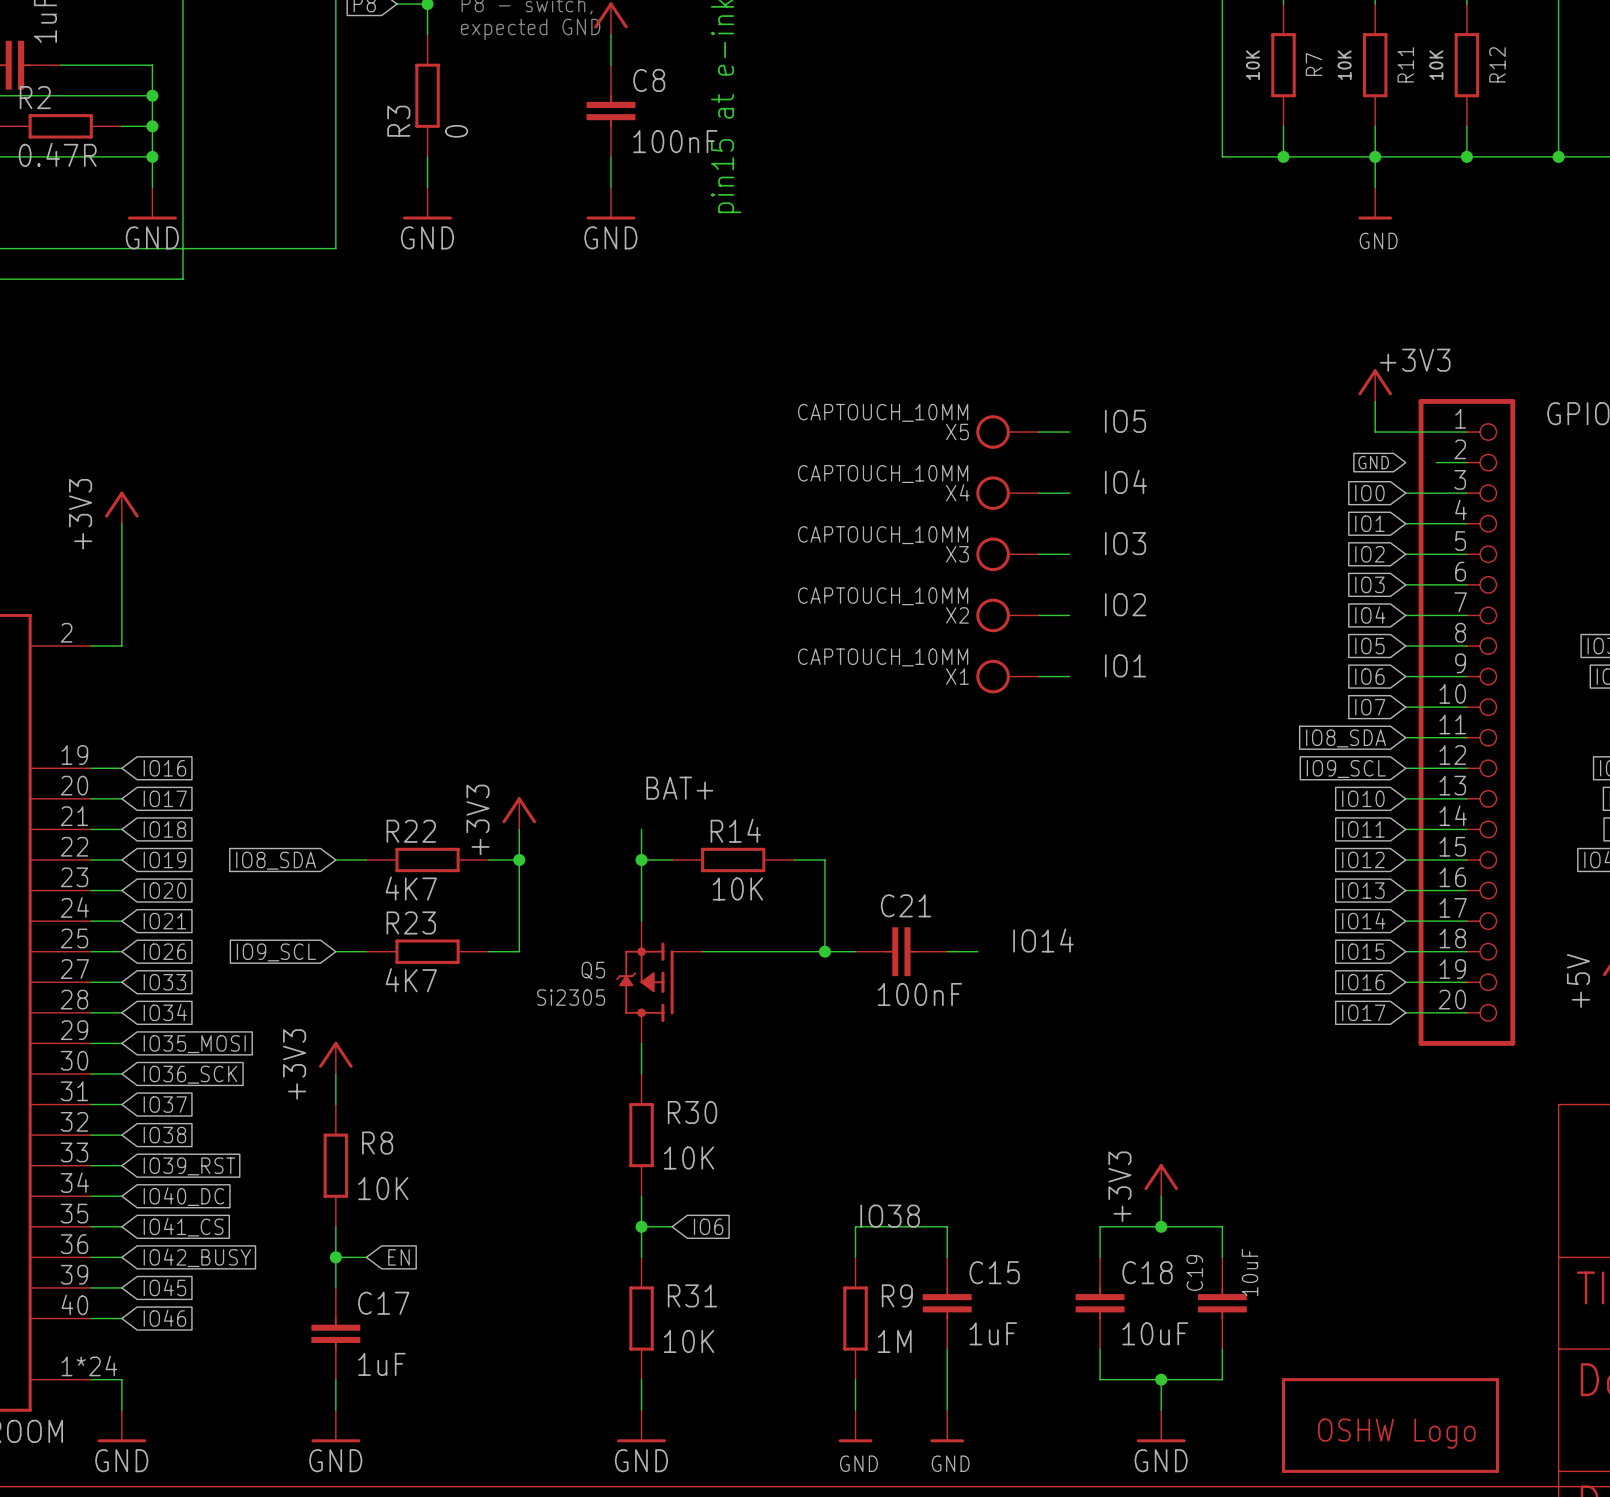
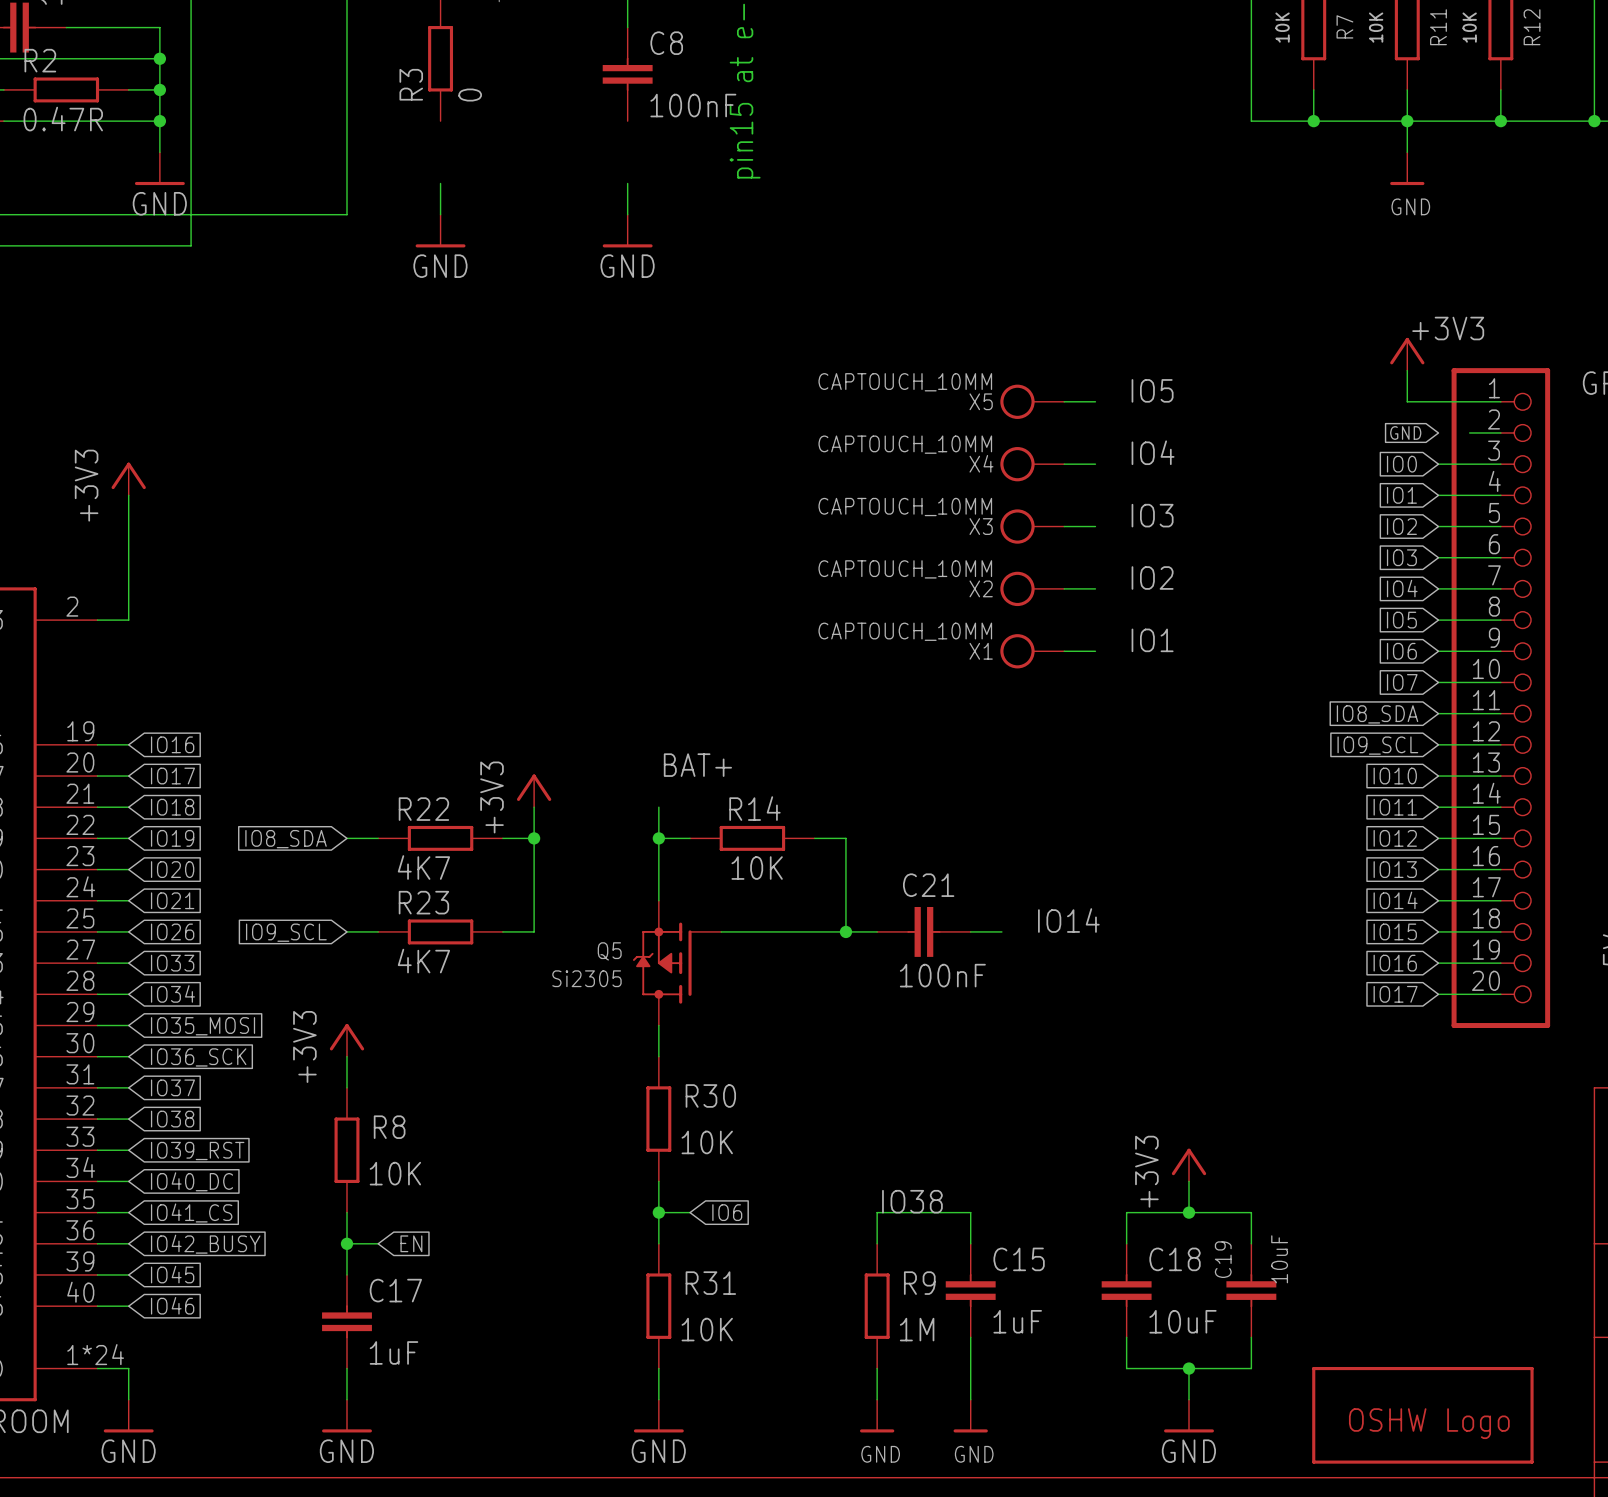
wire: (427, 156) (427, 187) -> (440, 183) (440, 214)
wire: (610, 156) (610, 187) -> (627, 183) (627, 214)
power symbol position: GND (427, 203) -> GND (440, 231)
power symbol position: GND (610, 203) -> GND (627, 231)

